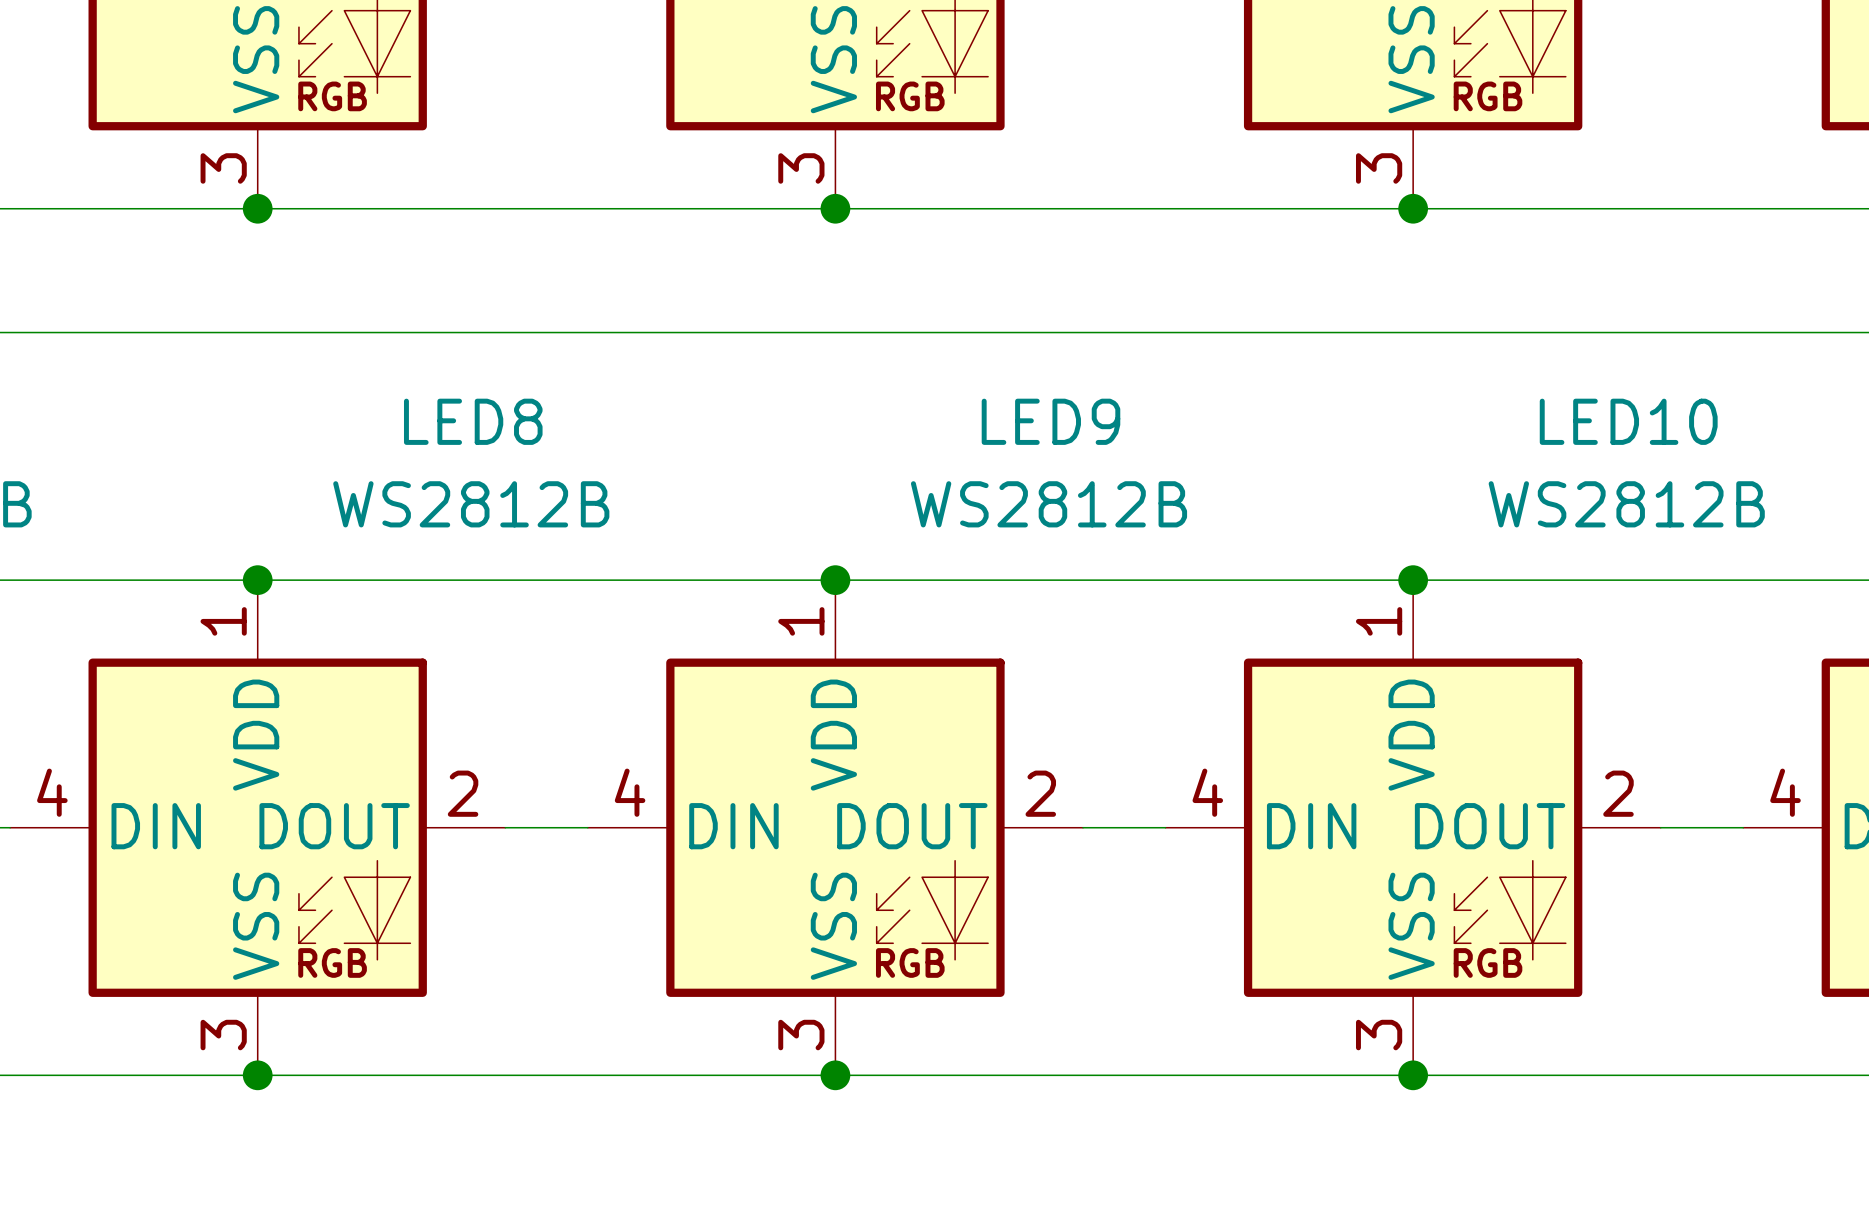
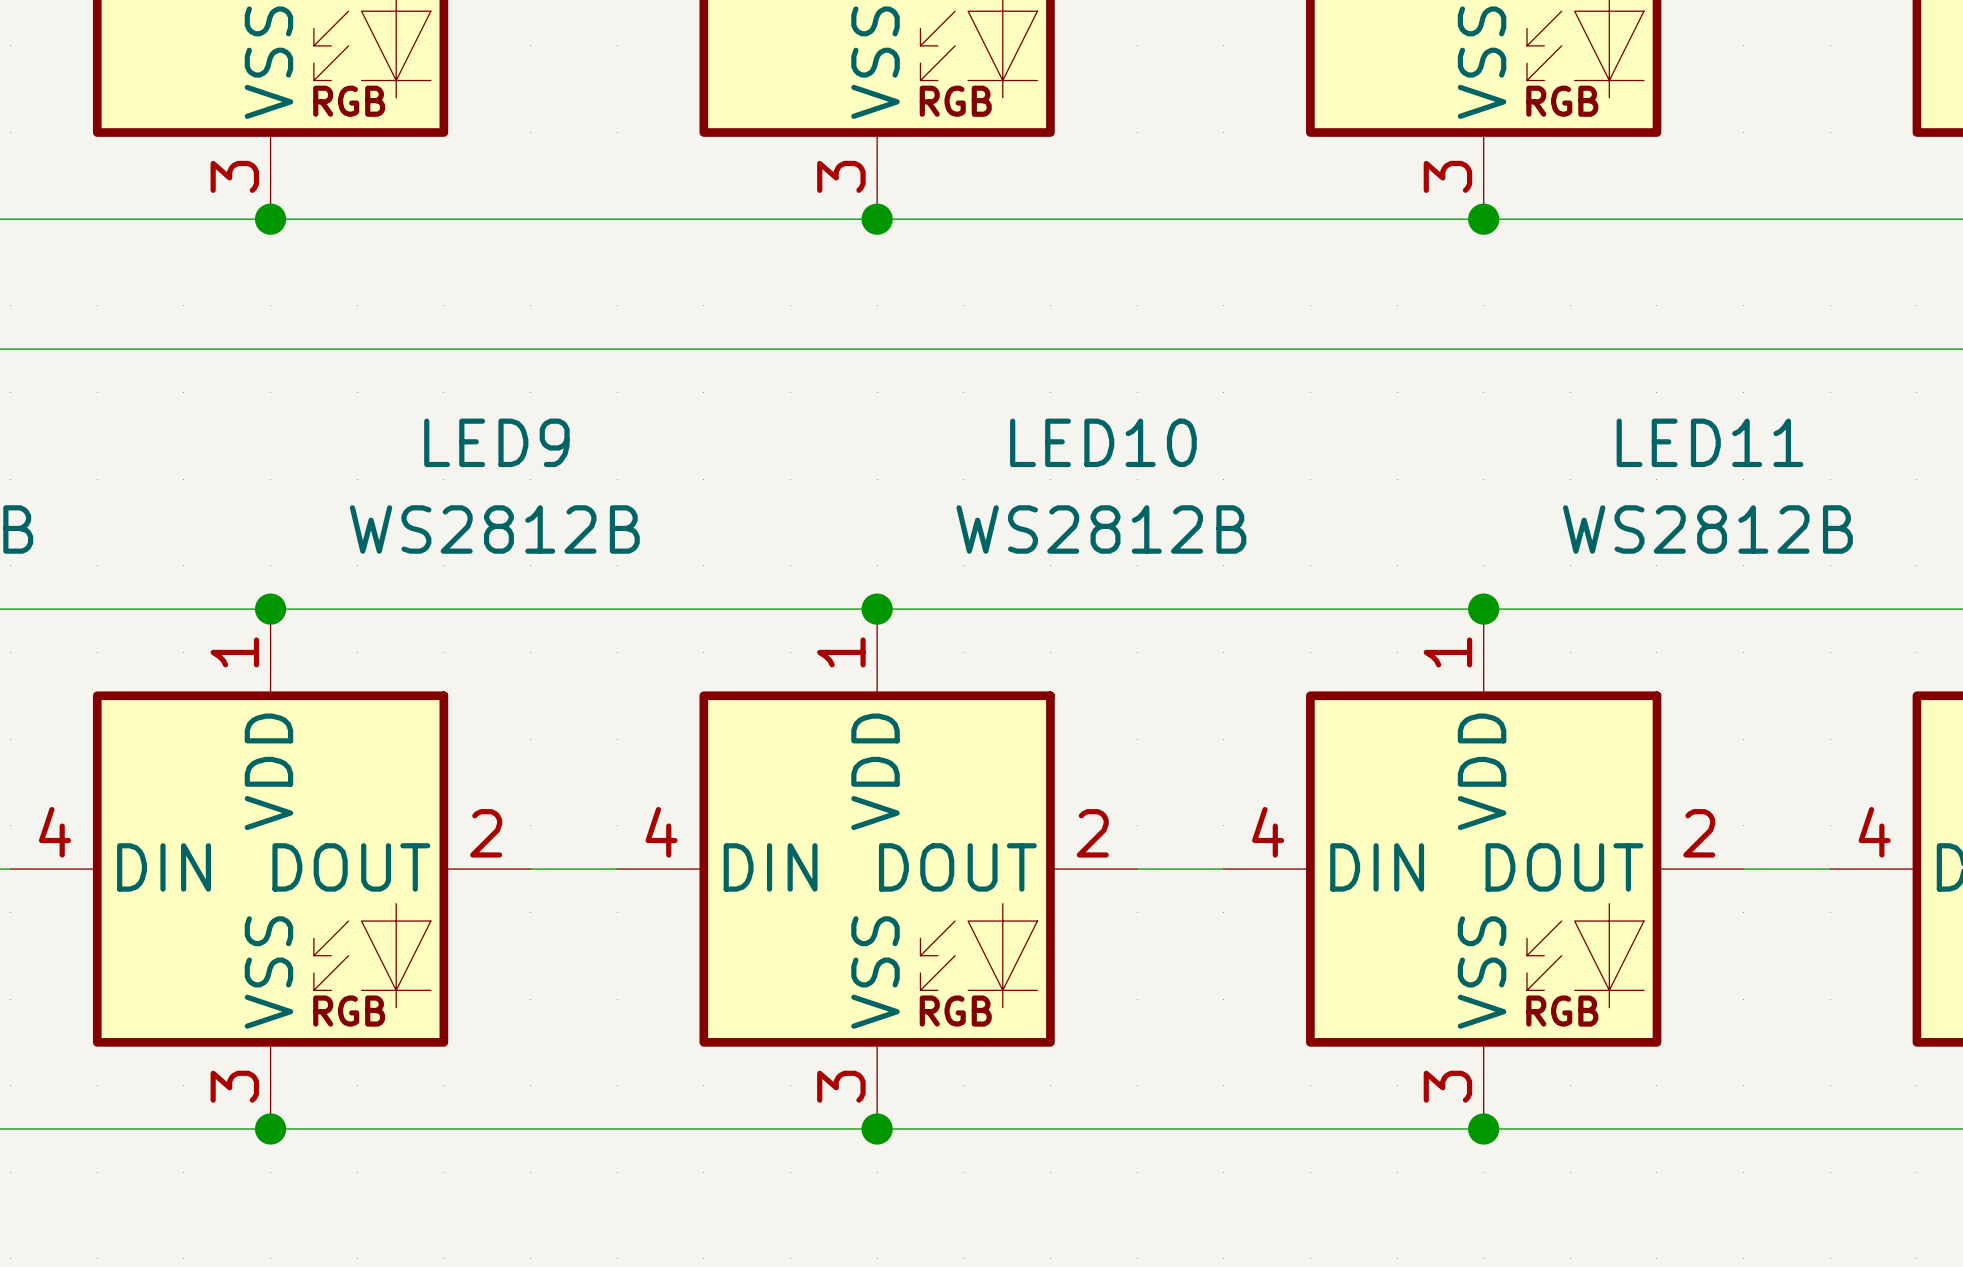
LED8 name: LED8 (473, 421) -> LED9 (496, 442)
LED9 name: LED9 (1050, 421) -> LED10 (1103, 442)
LED10 name: LED10 (1628, 421) -> LED11 (1710, 442)

